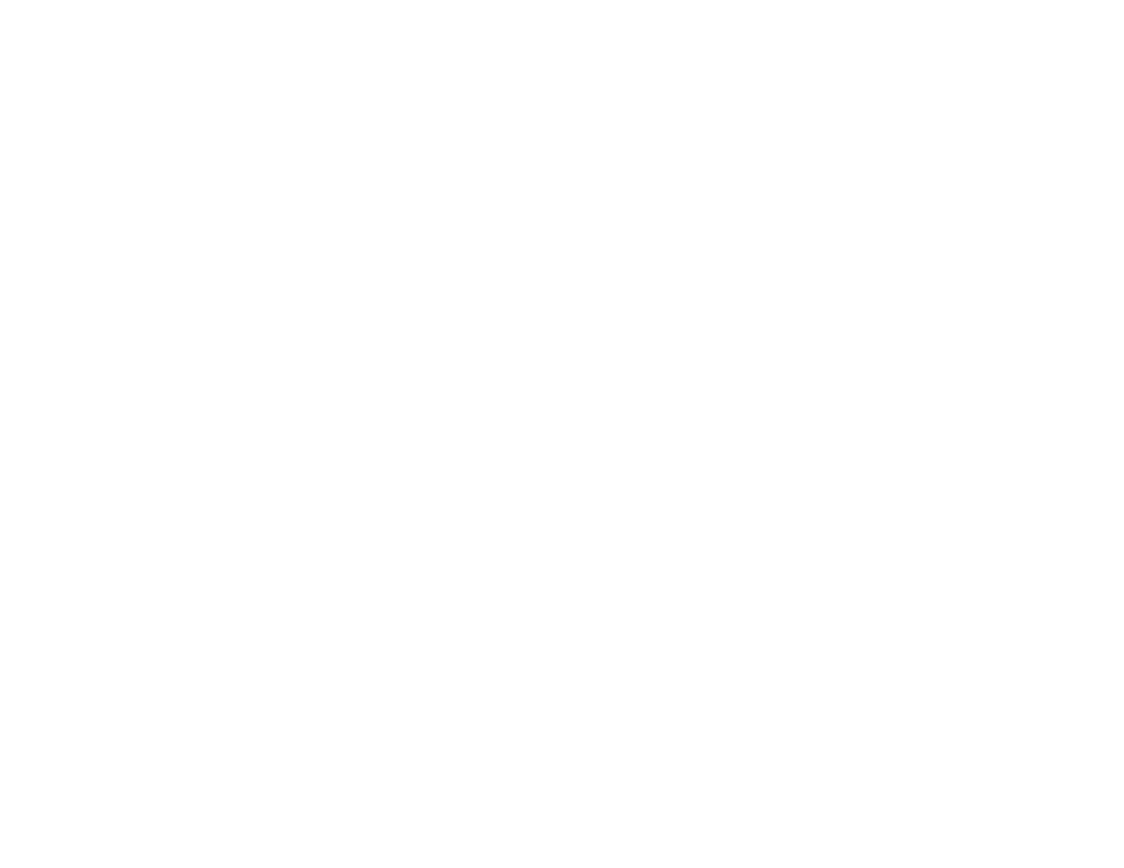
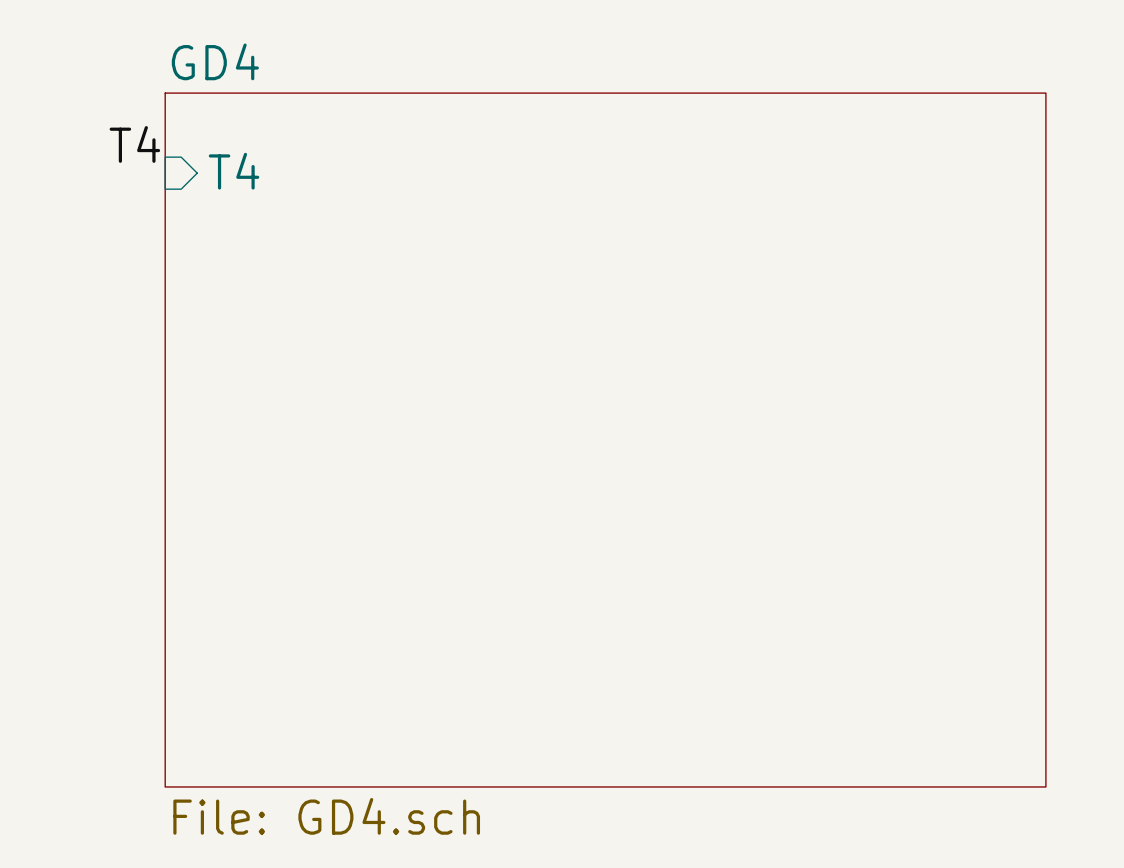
label: none -> T4 (134, 144)
sheet pin: none -> T4 (234, 171)
sheet GD4: none -> File: GD4.sch (605, 440)

